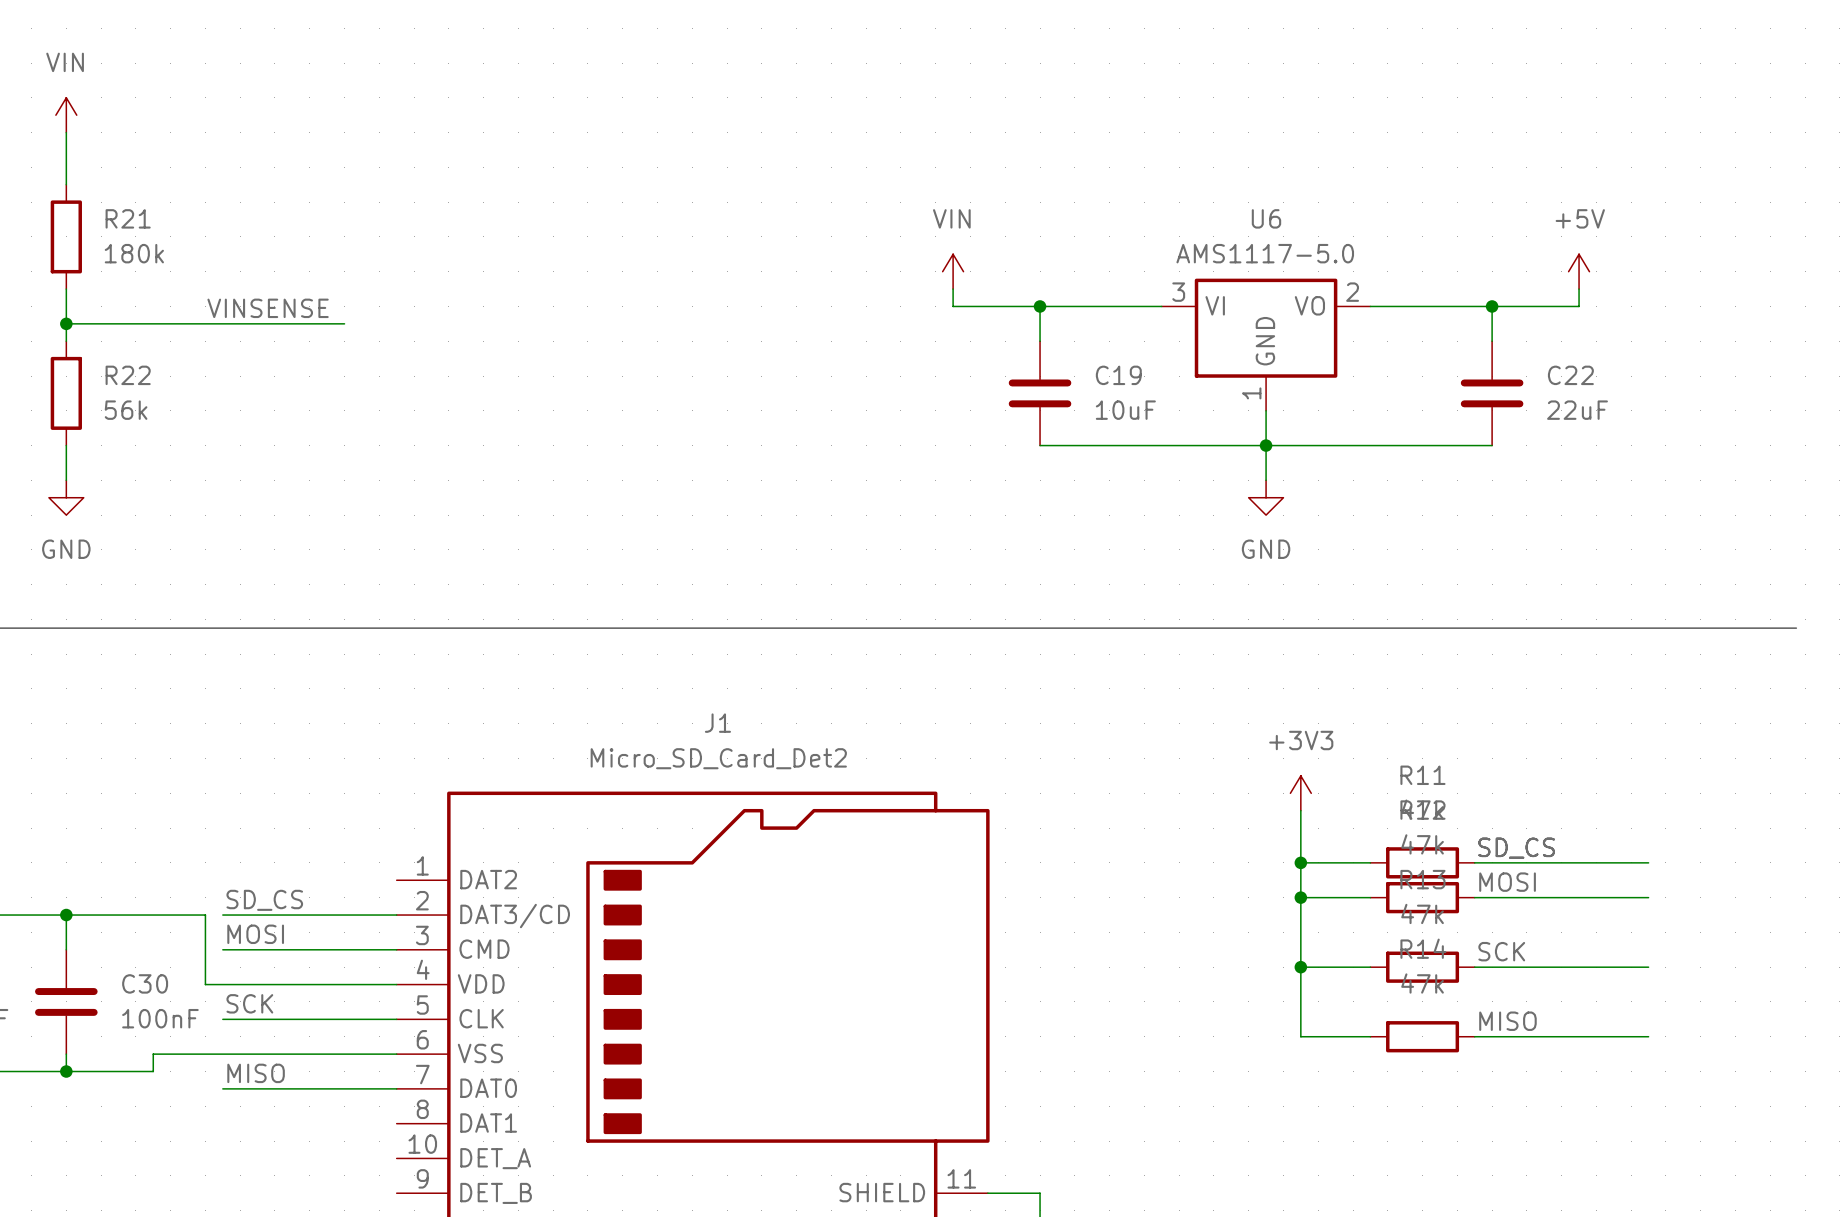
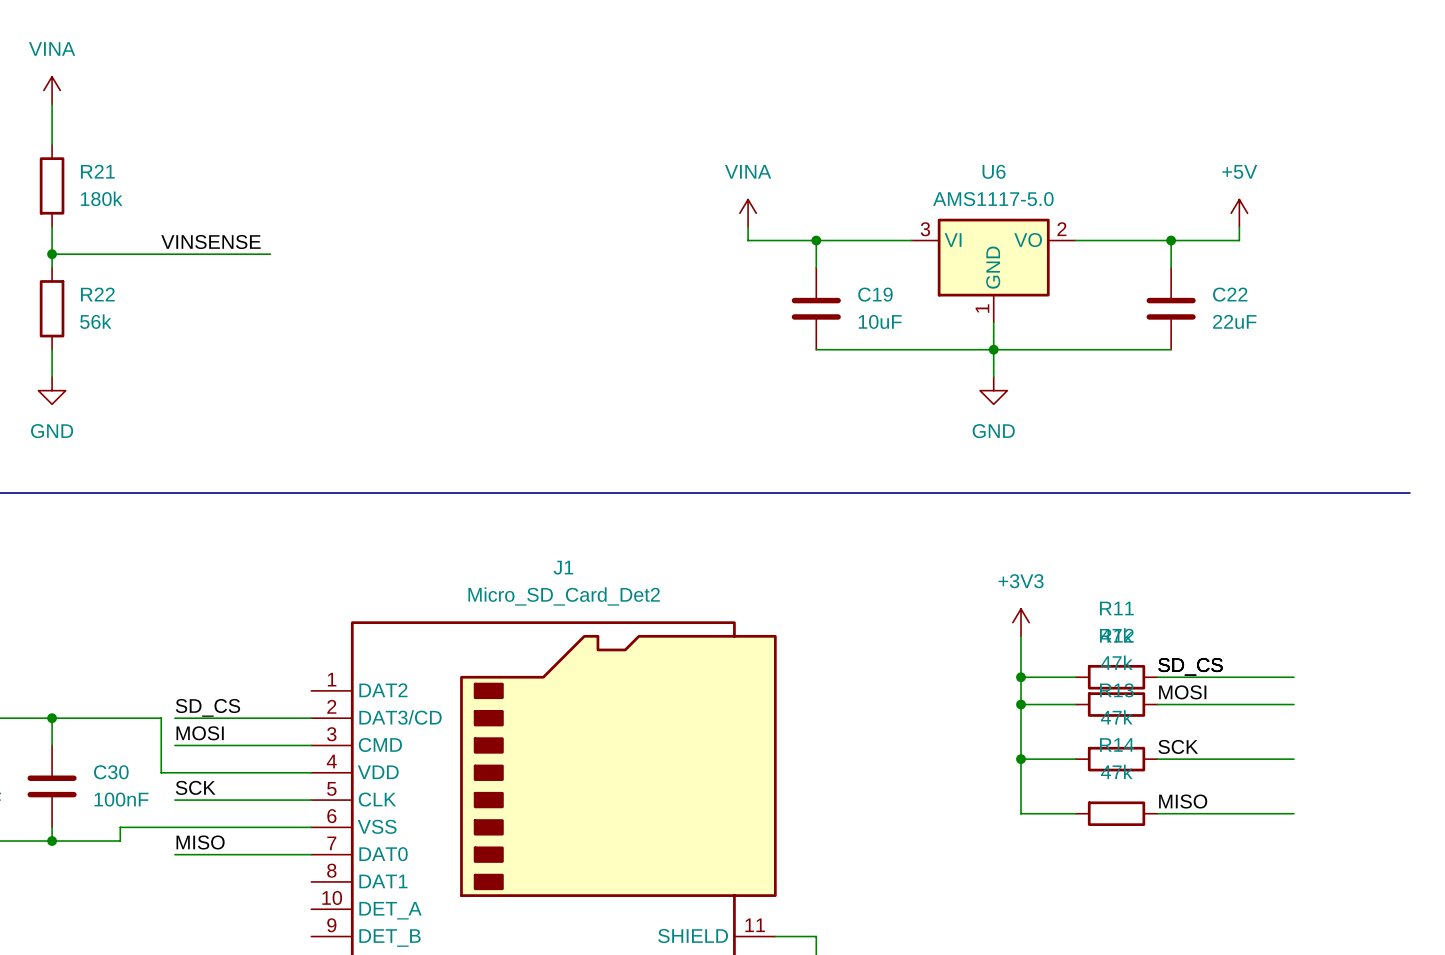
power symbol: VIN (66, 115) -> VINA (52, 90)
power symbol: VIN (953, 271) -> VINA (748, 213)

